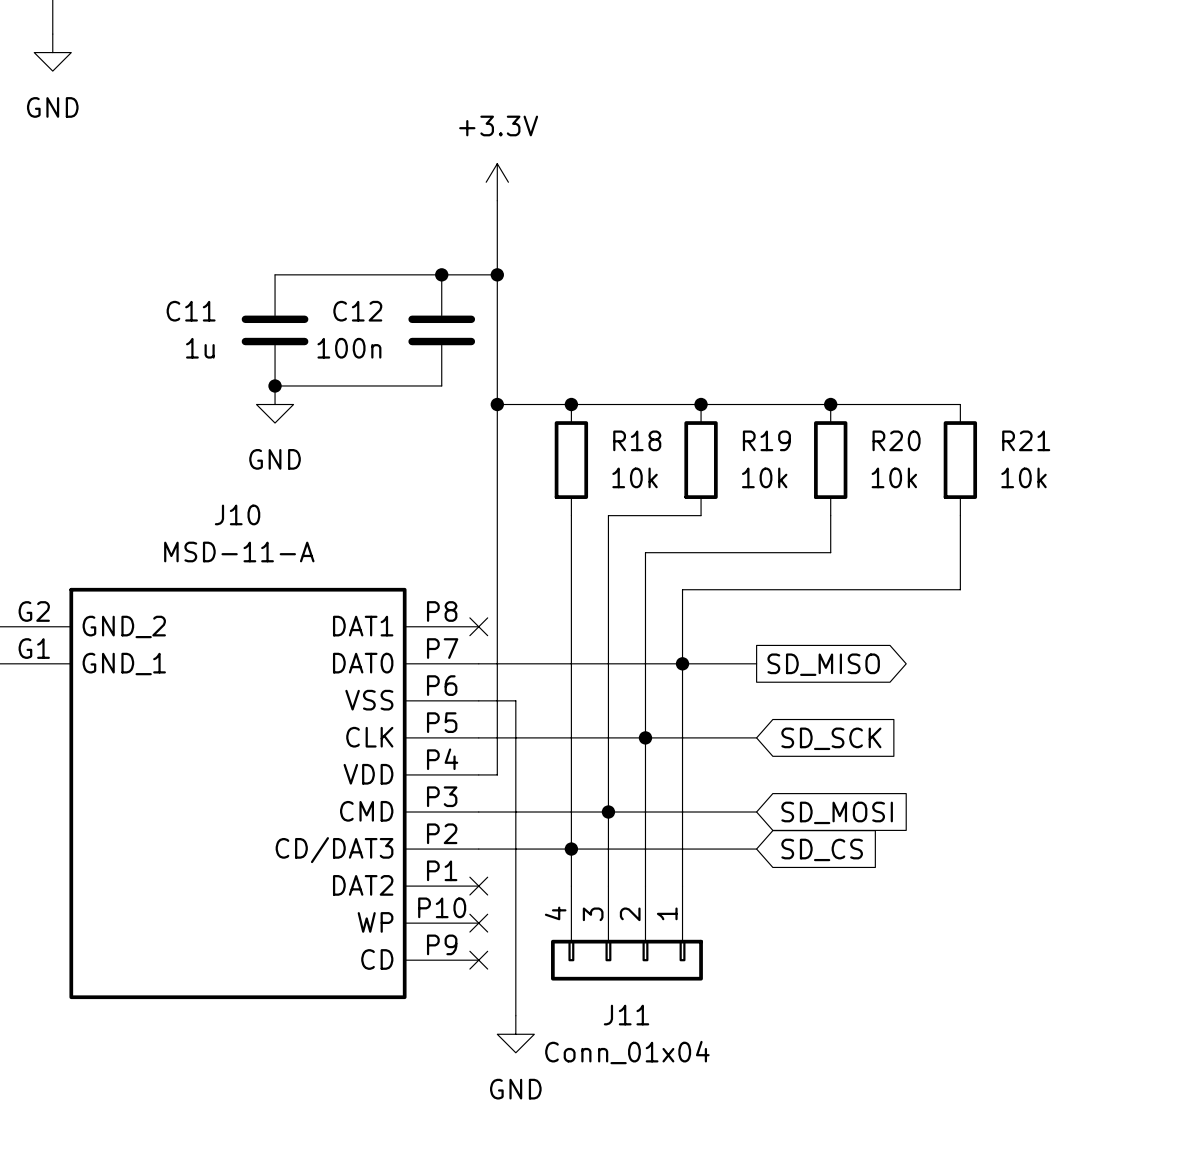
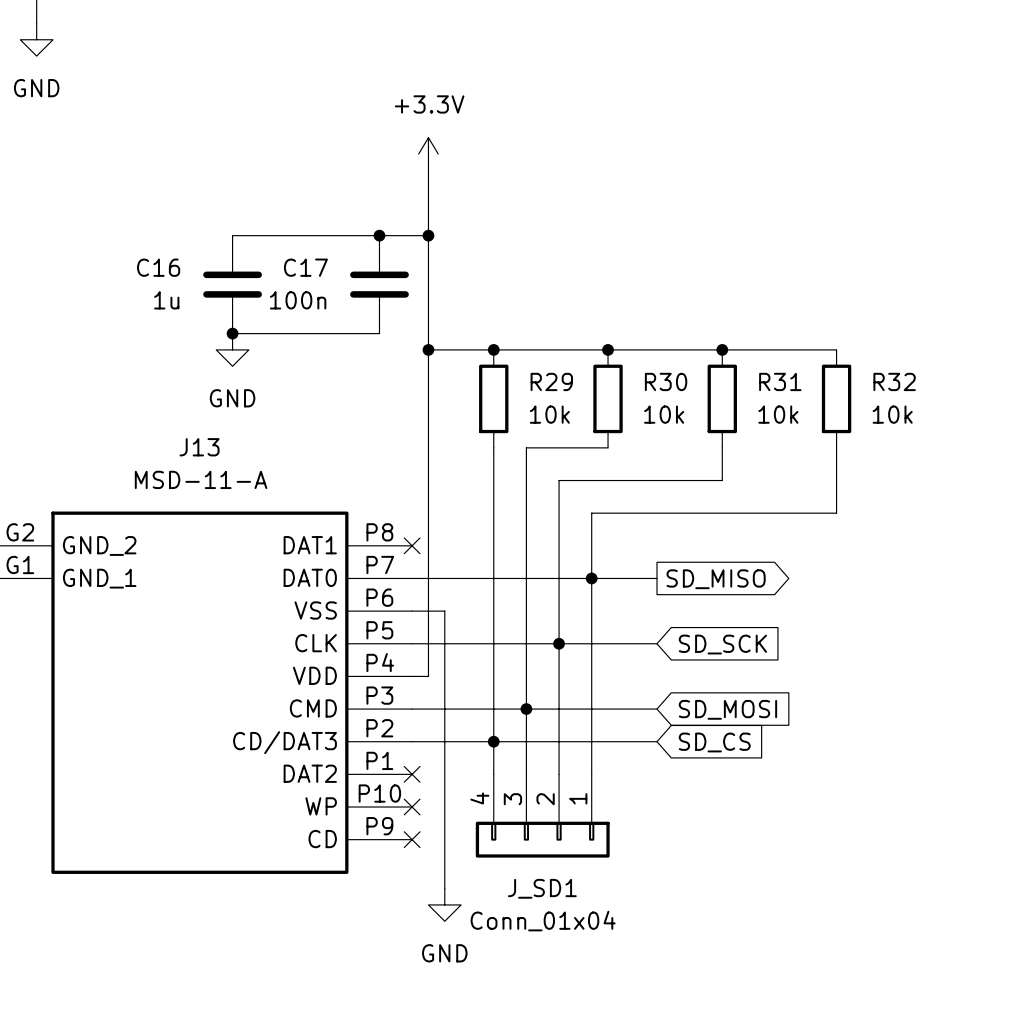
C11 name: C11 (191, 311) -> C16 (158, 267)
C12 name: C12 (357, 311) -> C17 (305, 267)
R18 name: R18 (637, 440) -> R29 (551, 381)
R19 name: R19 (766, 440) -> R30 (666, 381)
R20 name: R20 (896, 440) -> R31 (780, 381)
R21 name: R21 (1026, 440) -> R32 (894, 381)
J10 name: J10 (237, 514) -> J13 (199, 447)
J11 name: J11 (626, 1015) -> J_SD1 (542, 888)

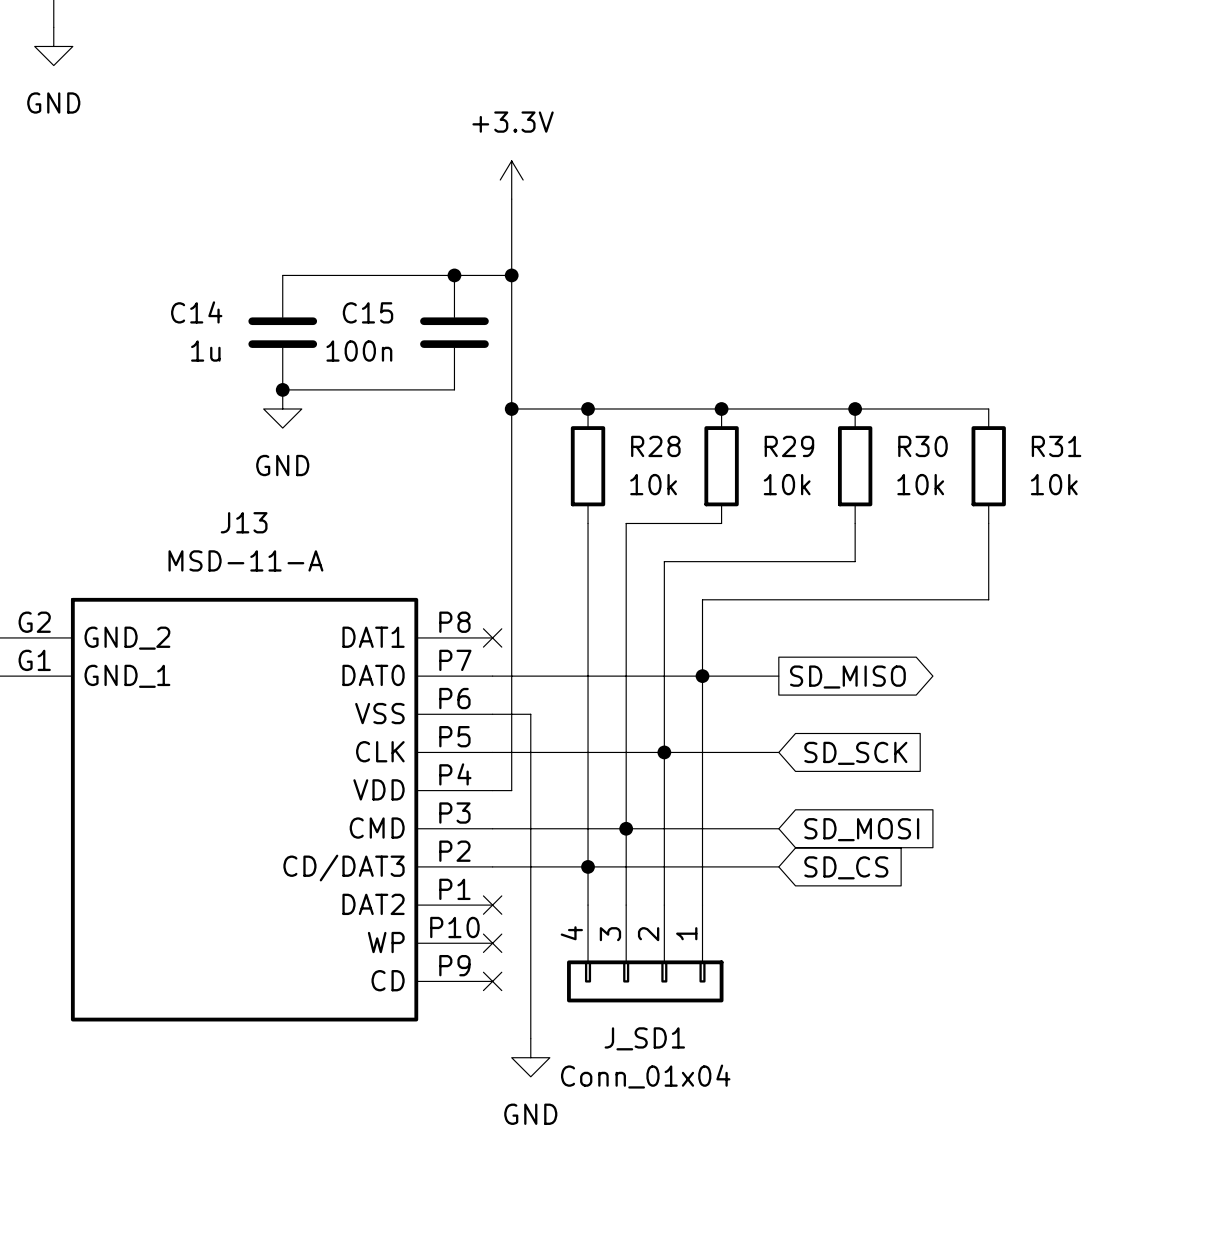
C16 name: C16 (158, 267) -> C14 (196, 312)
C17 name: C17 (305, 267) -> C15 (368, 312)
R29 name: R29 (551, 381) -> R28 (655, 446)
R30 name: R30 (666, 381) -> R29 (789, 446)
R31 name: R31 (780, 381) -> R30 (922, 446)
R32 name: R32 (894, 381) -> R31 (1056, 446)

